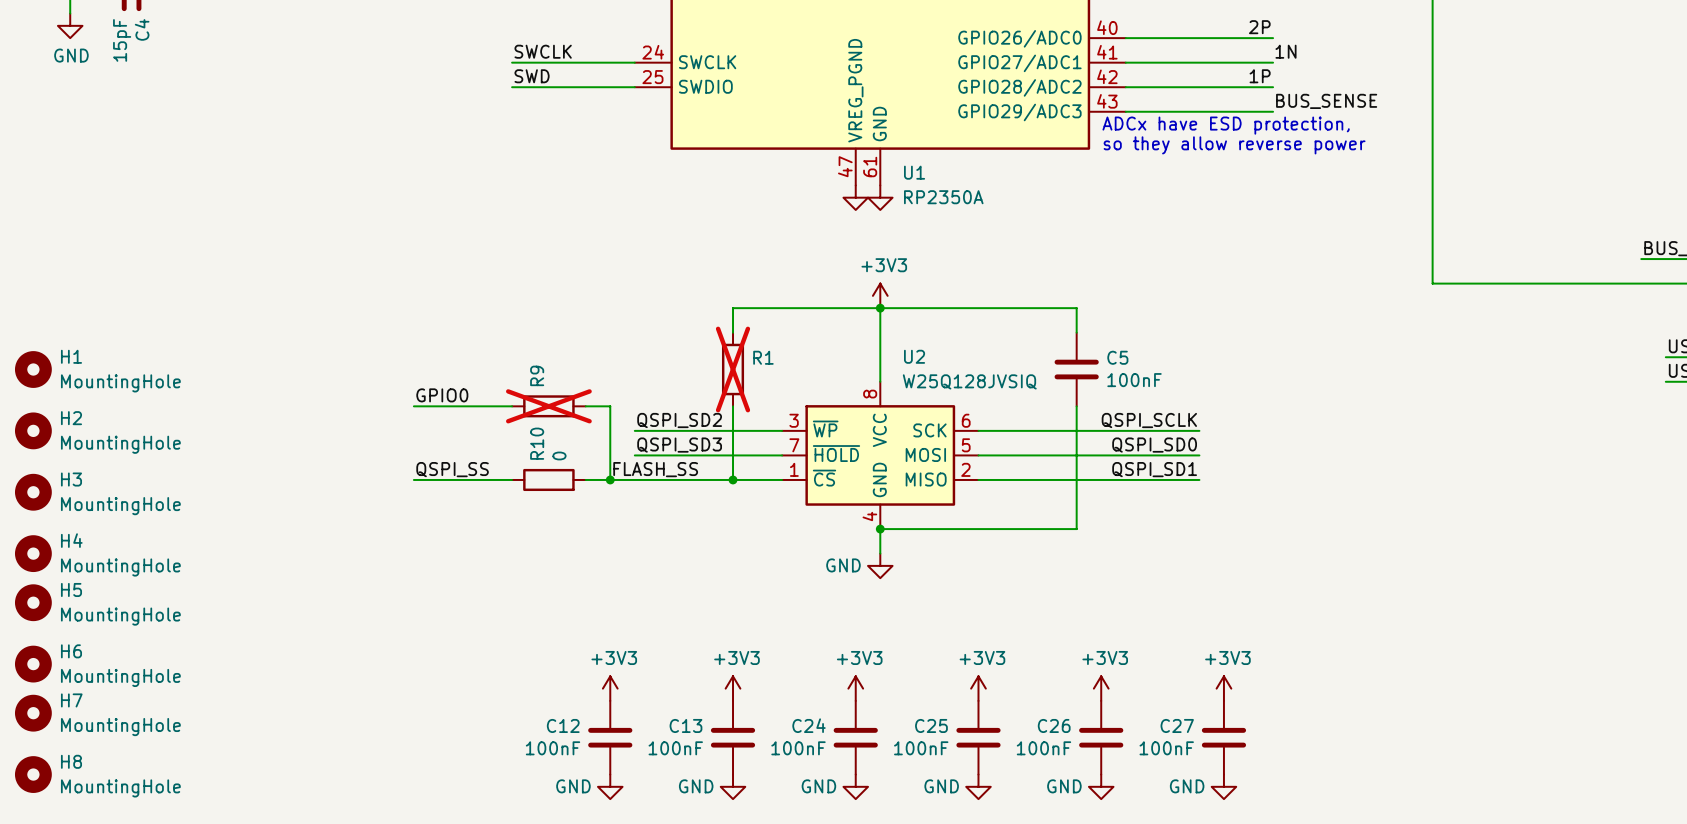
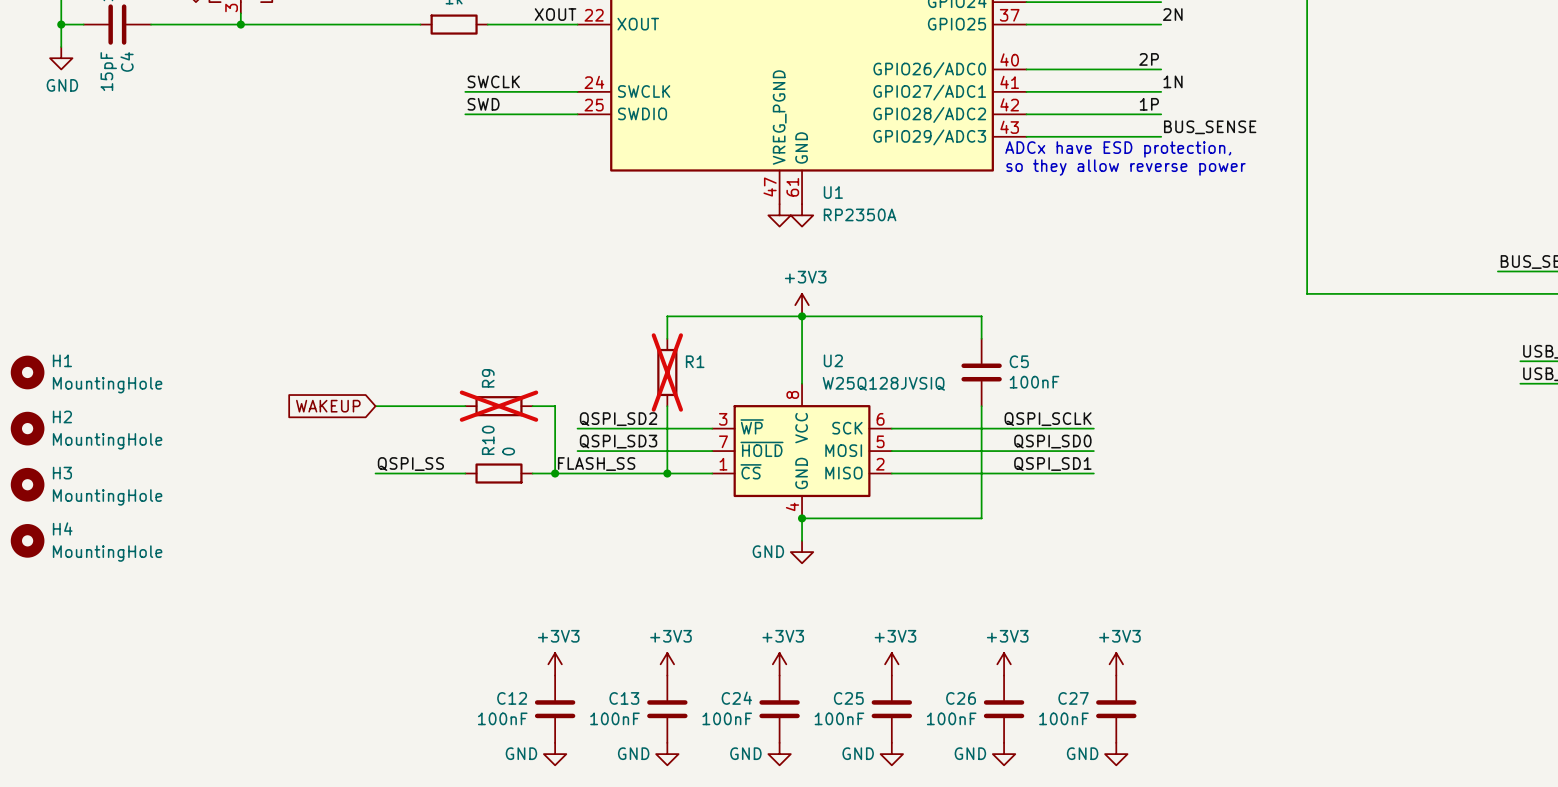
label: GPIO0 (442, 395) -> none
global label: none -> WAKEUP (328, 406)
H5: MountingHole (33, 602) -> none
H6: MountingHole (33, 664) -> none
H7: MountingHole (33, 713) -> none
H8: MountingHole (33, 774) -> none

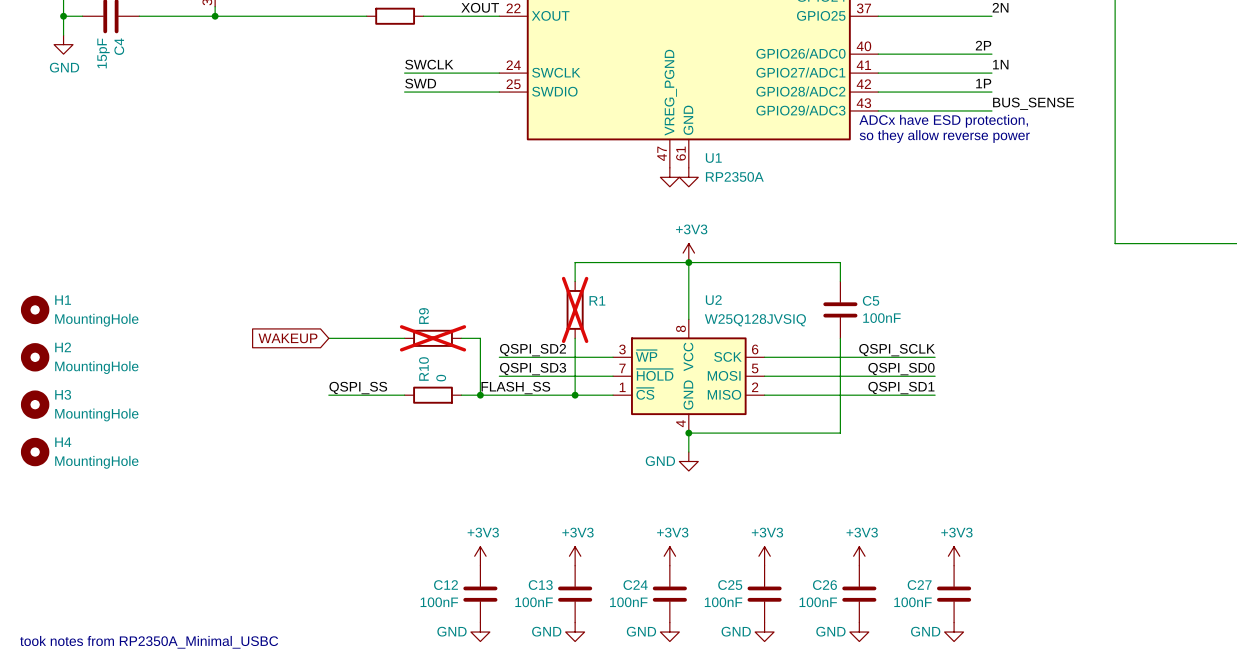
text: none -> took notes from RP2350A_Minimal_USBC (149, 642)

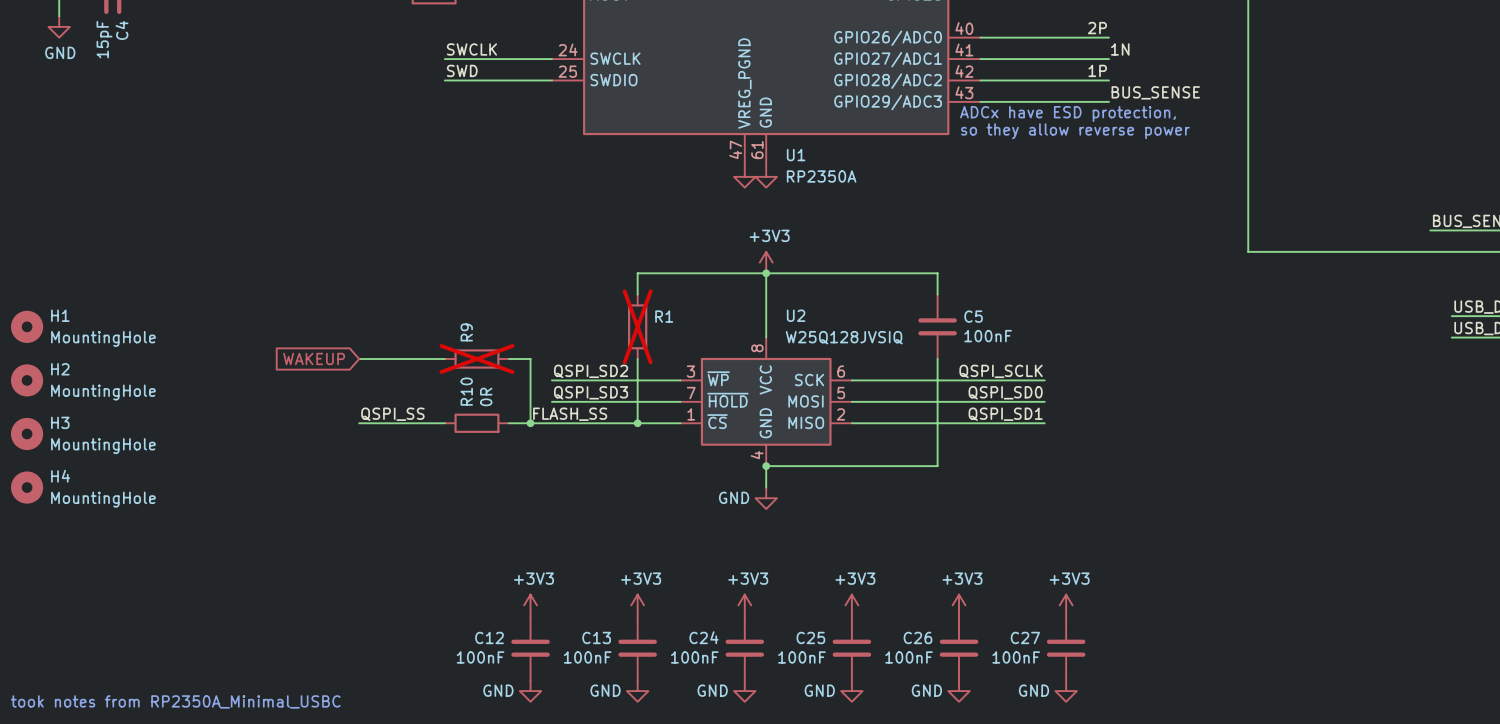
R10 value: 0 (441, 378) -> 0R (486, 396)

